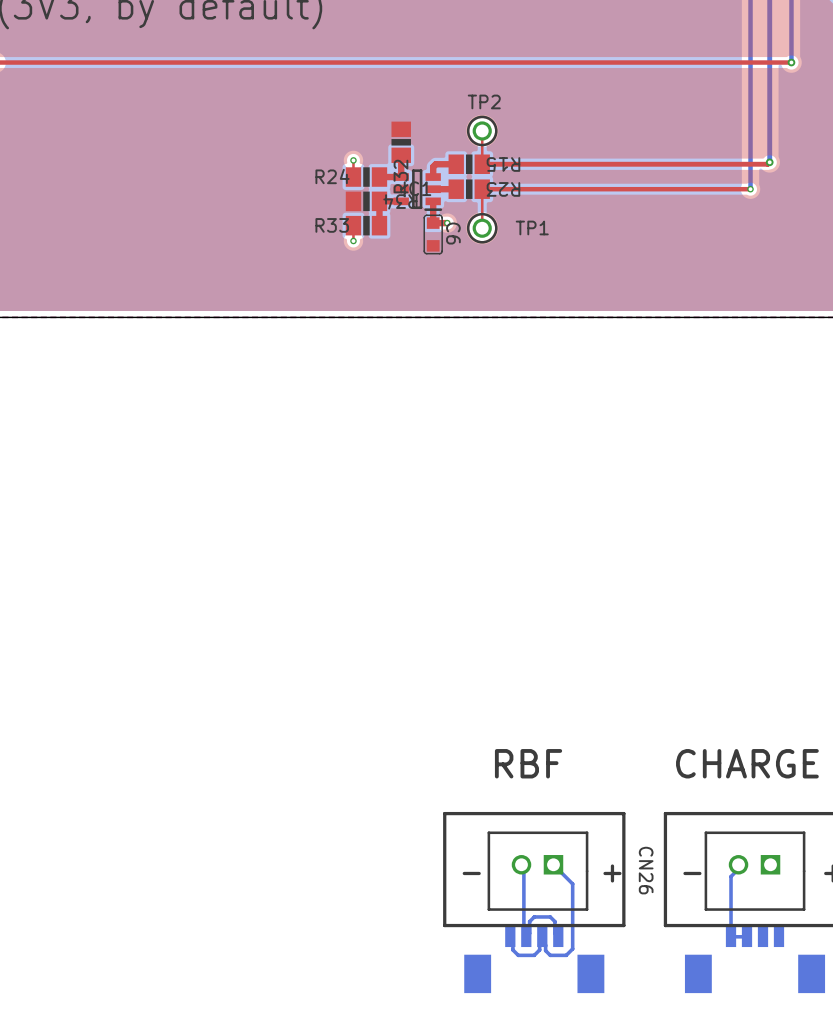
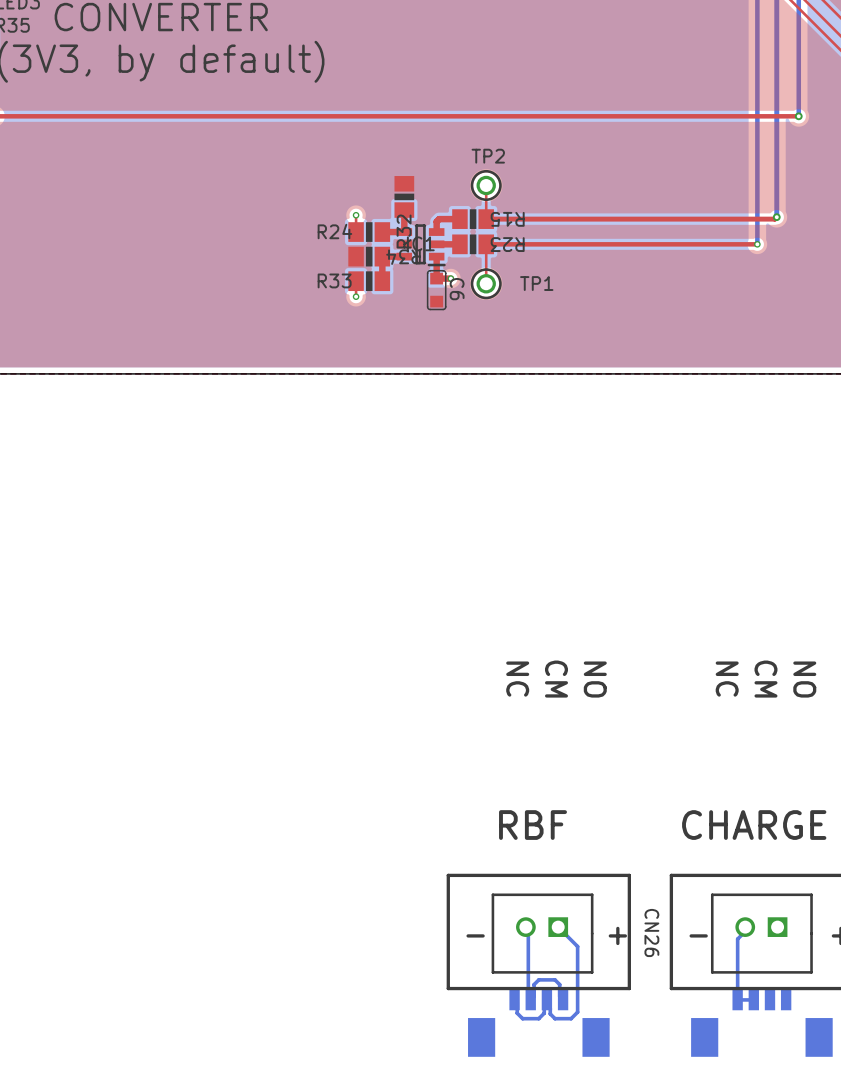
text: none -> NC (517, 679)
text: none -> CM (556, 679)
text: none -> NO (595, 679)
text: none -> NC (727, 679)
text: none -> CM (765, 679)
text: none -> NO (804, 679)

